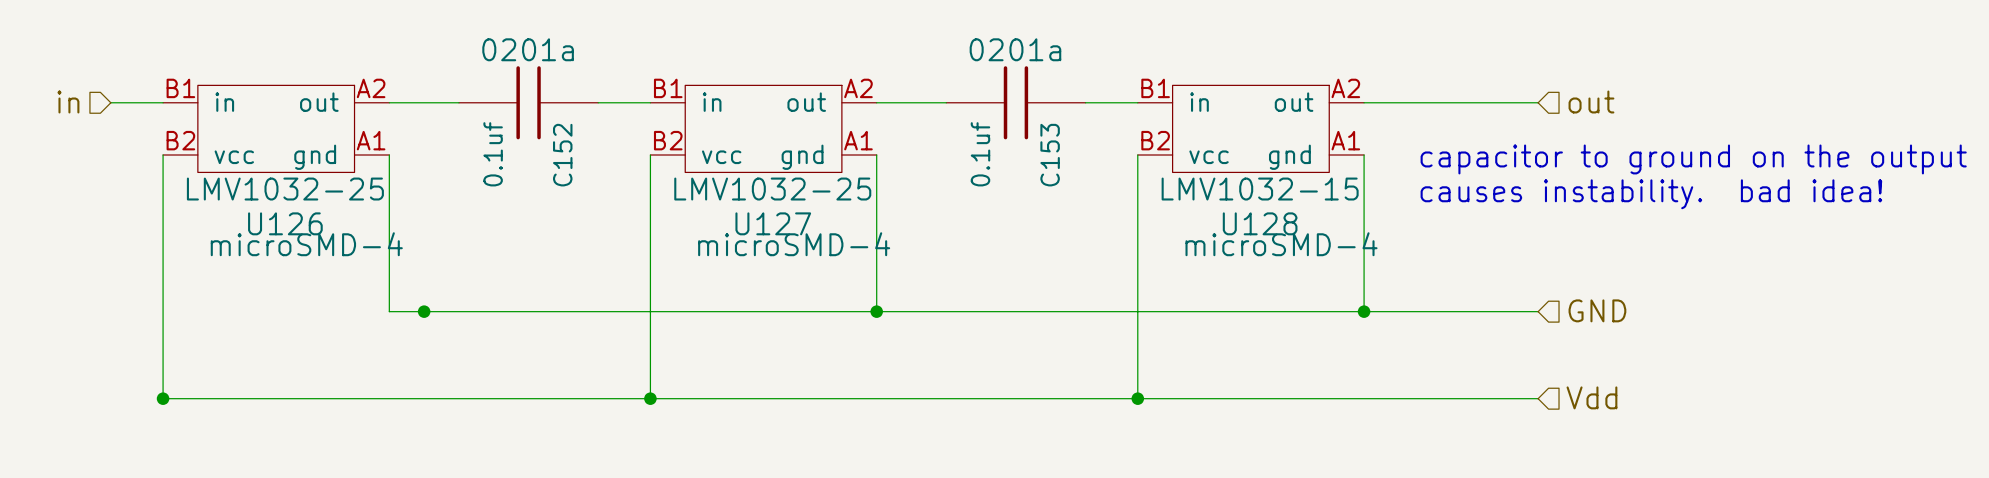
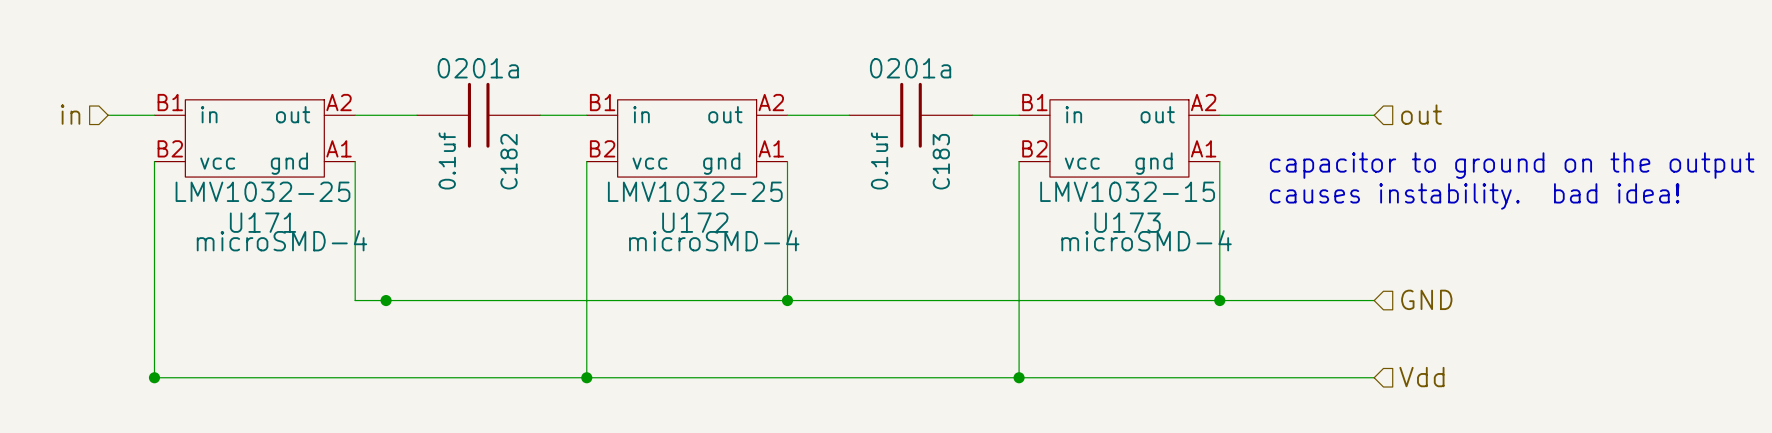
C152 name: C152 (562, 155) -> C182 (509, 161)
C153 name: C153 (1050, 155) -> C183 (941, 161)
U126 name: U126 (285, 223) -> U171 (262, 222)
U127 name: U127 (773, 223) -> U172 (695, 222)
U128 name: U128 (1260, 223) -> U173 (1127, 222)

